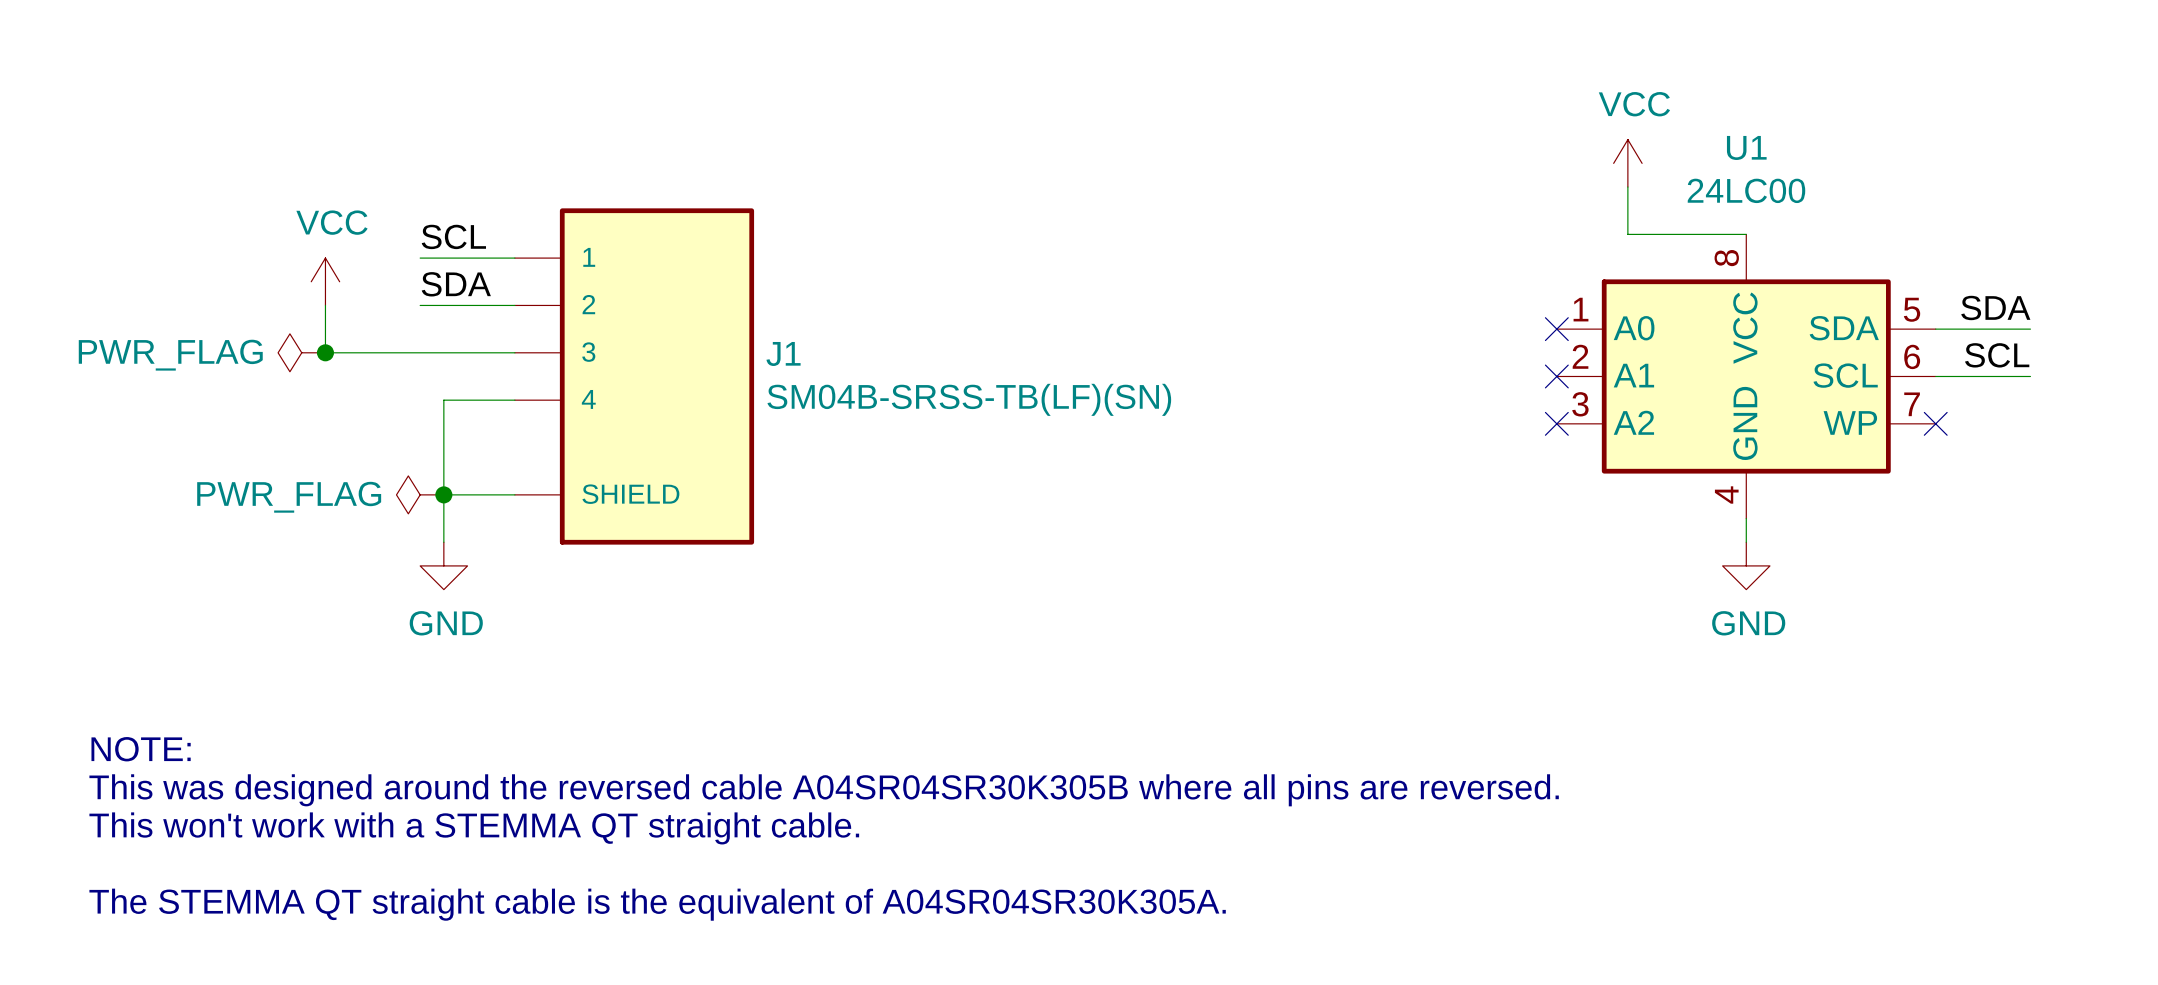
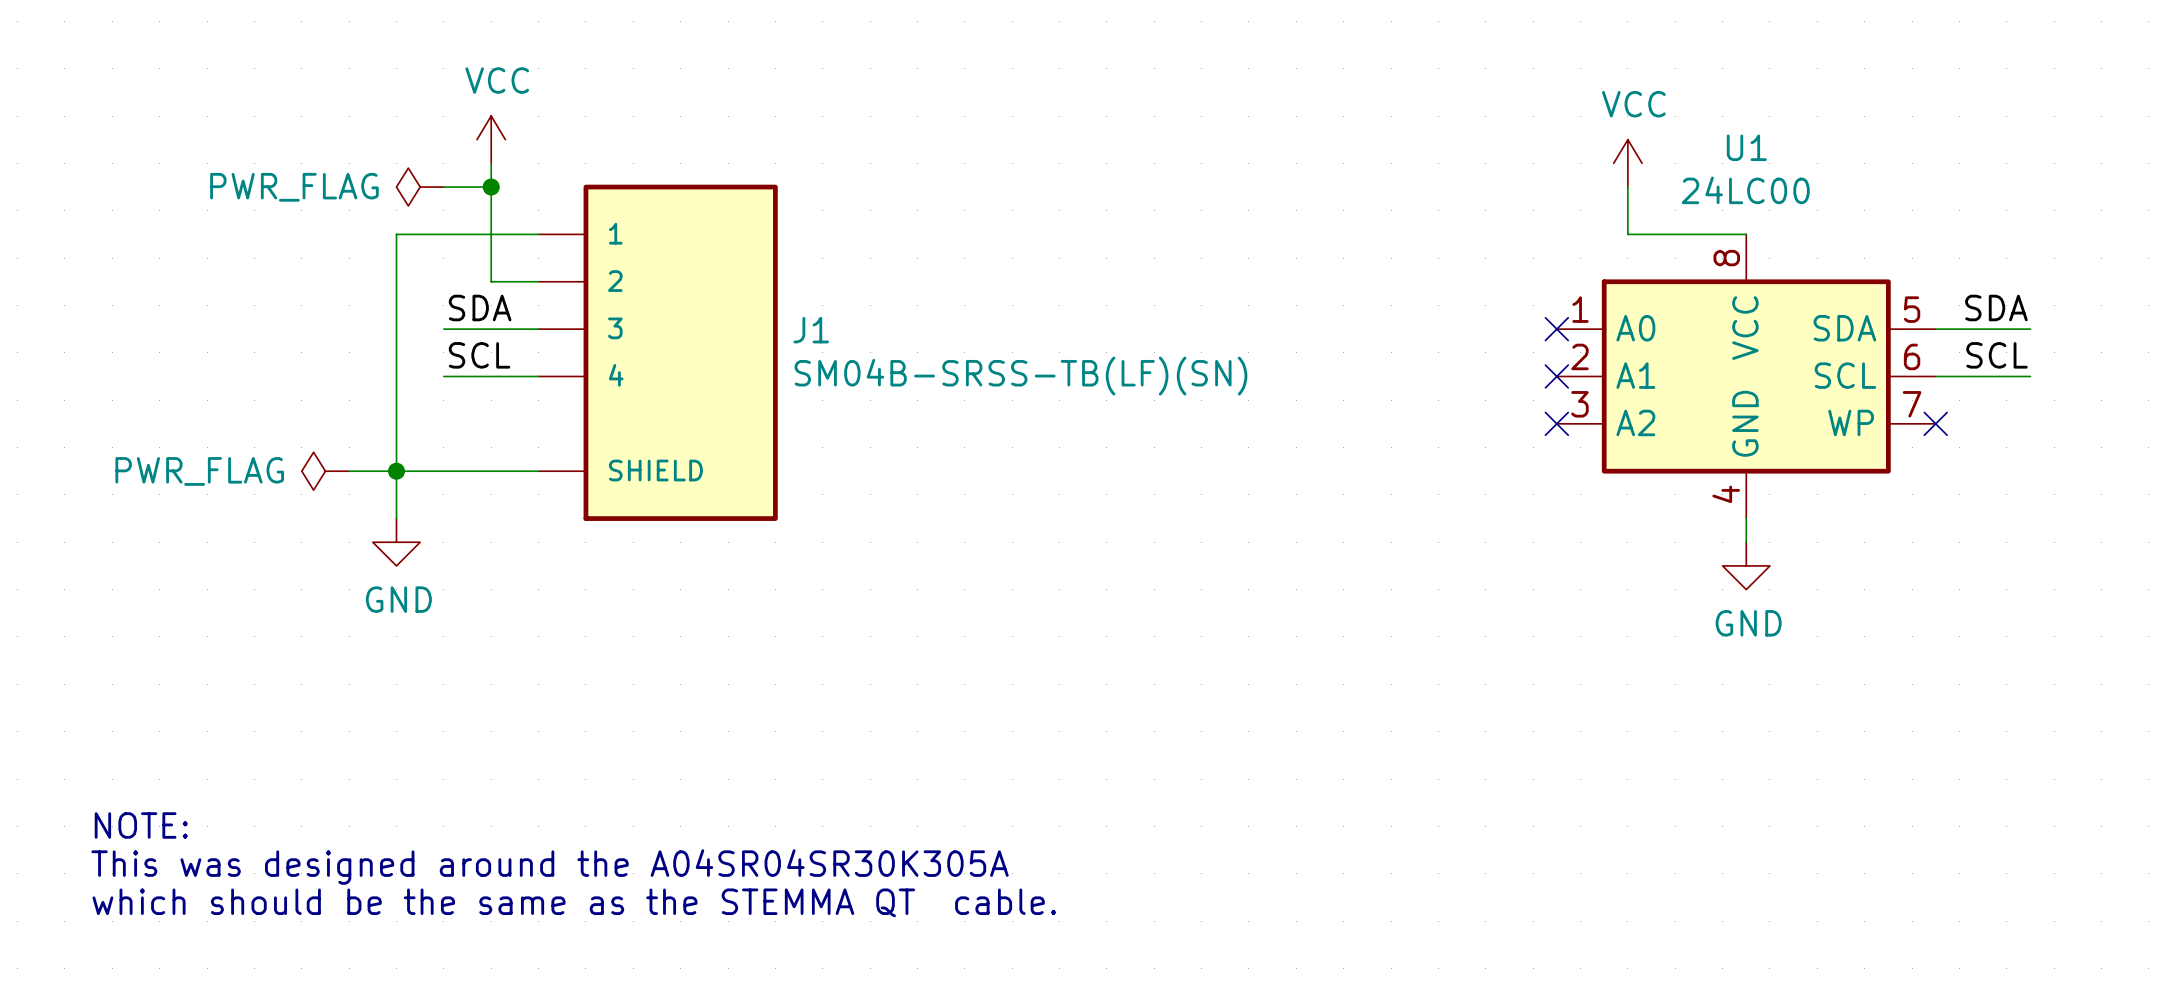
wire: none -> (491, 163) (491, 281) (538, 281)
power symbol: none -> PWR_FLAG (420, 187)
wire: none -> (443, 187) (491, 187)
junction: none -> (491, 187)
wire: none -> (538, 234) (396, 234) (396, 518)
label position: SCL (453, 236) -> SCL (479, 355)
wire: (420, 258) (514, 258) -> (443, 329) (538, 329)
power symbol position: VCC (325, 281) -> VCC (491, 139)
label position: SDA (456, 284) -> SDA (480, 307)
wire: (325, 305) (325, 352) (514, 352) -> none
wire: (420, 305) (514, 305) -> (443, 376) (538, 376)
power symbol: PWR_FLAG (301, 352) -> none
junction: (325, 352) -> none
J1 position: (634, 376) -> (658, 352)
wire: (514, 400) (443, 400) (443, 542) -> none
power symbol: none -> PWR_FLAG (325, 471)
wire: none -> (349, 471) (538, 471)
power symbol: PWR_FLAG (420, 494) -> none
wire: (443, 494) (514, 494) -> none
junction position: (443, 494) -> (396, 471)
power symbol position: GND (443, 565) -> GND (396, 542)
text: NOTE: (141, 749) -> none
text: This was designed around the reversed cable A04SR04SR30K305B where all pins are reversed. (824, 790) -> none
text: This won't work with a STEMMA QT straight cable. (474, 828) -> NOTE: (141, 825)
text: none -> This was designed around the A04SR04SR30K305A (550, 866)
text: The STEMMA QT straight cable is the equivalent of A04SR04SR30K305A. (657, 904) -> which should be the same as the STEMMA QT cable. (574, 902)

